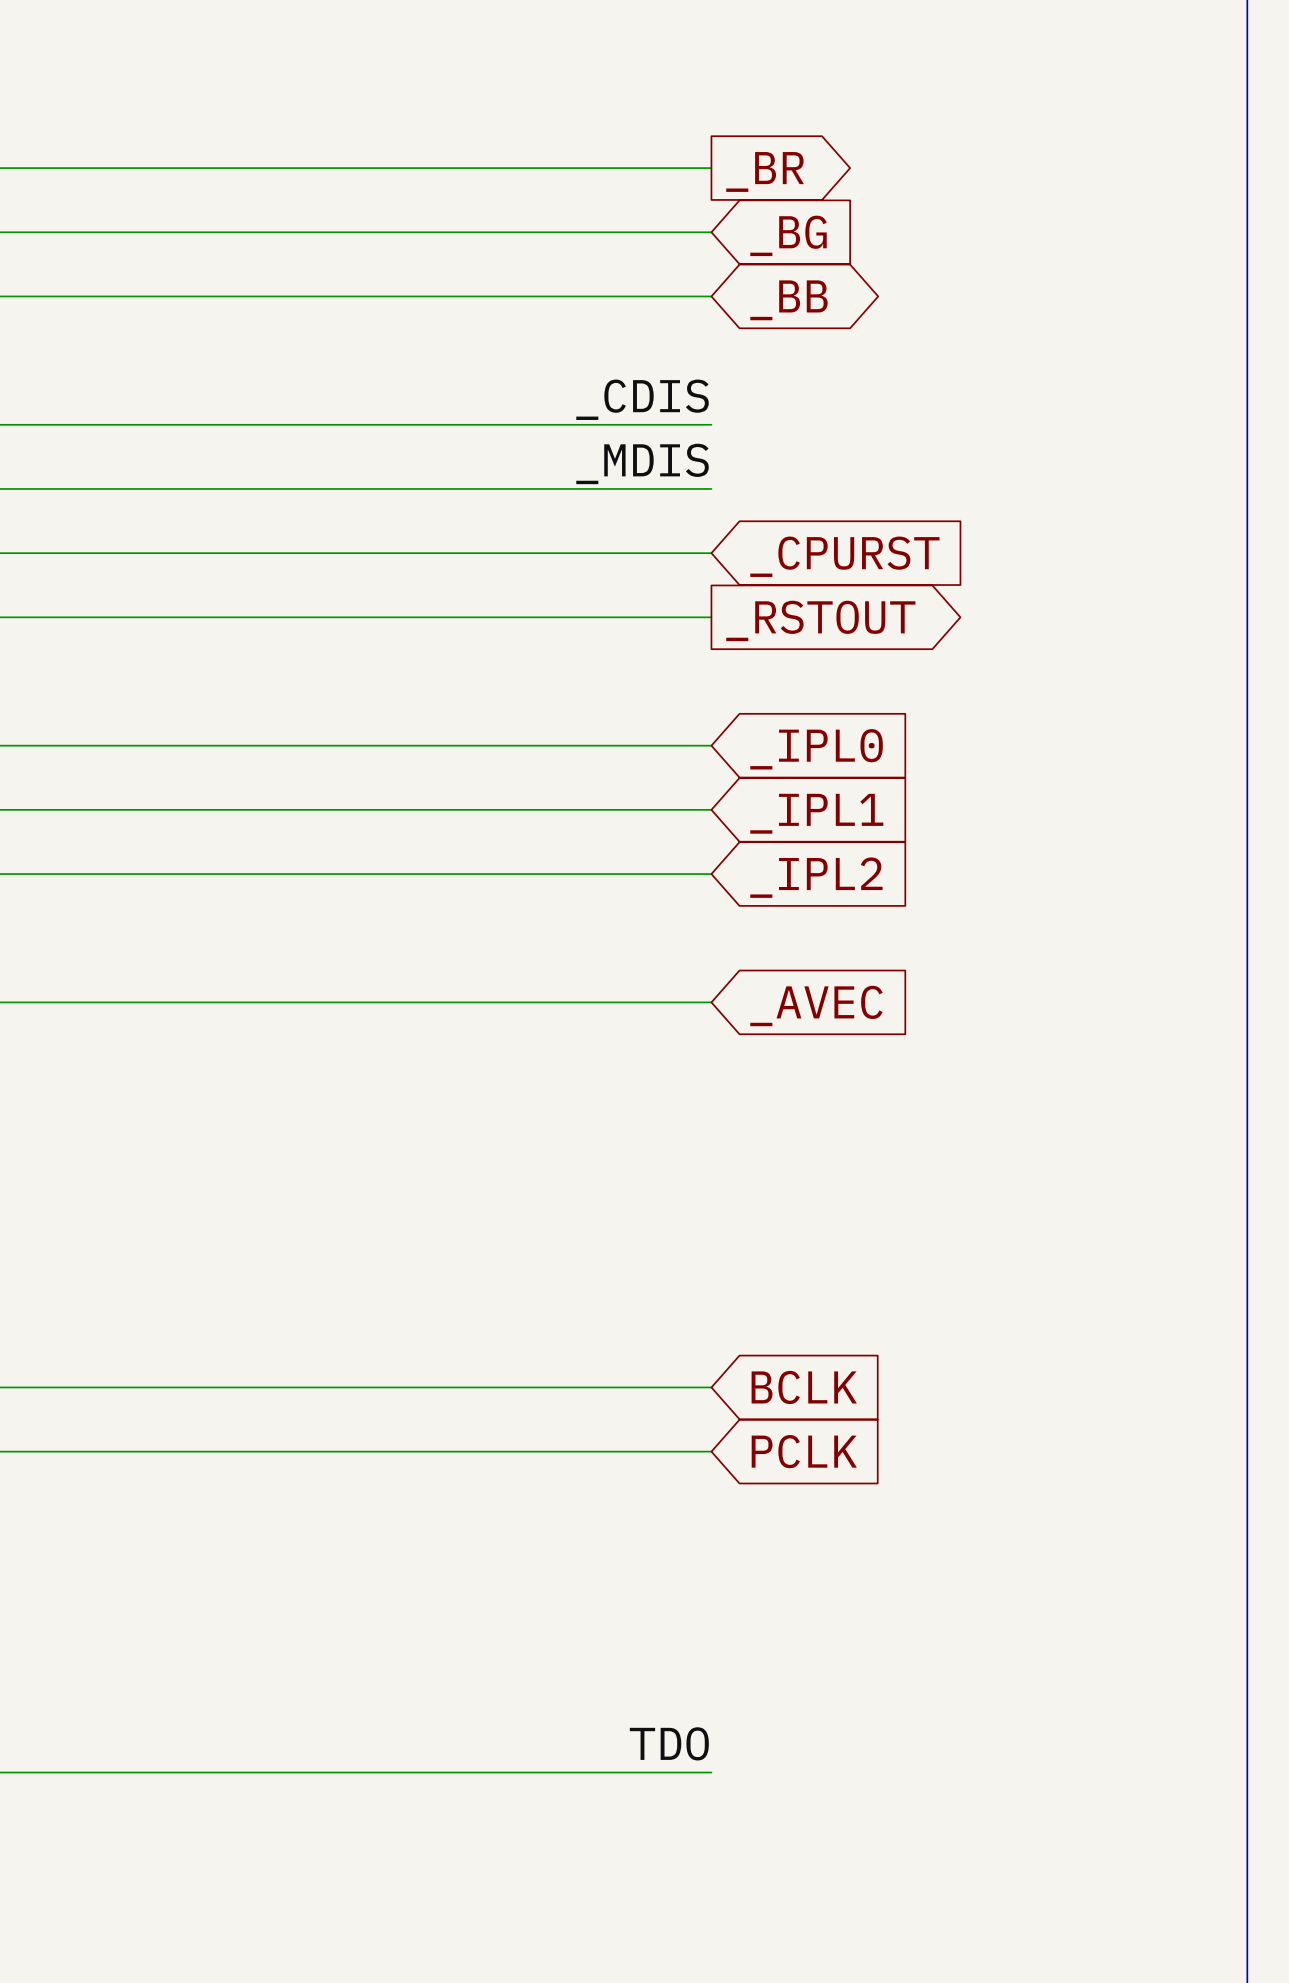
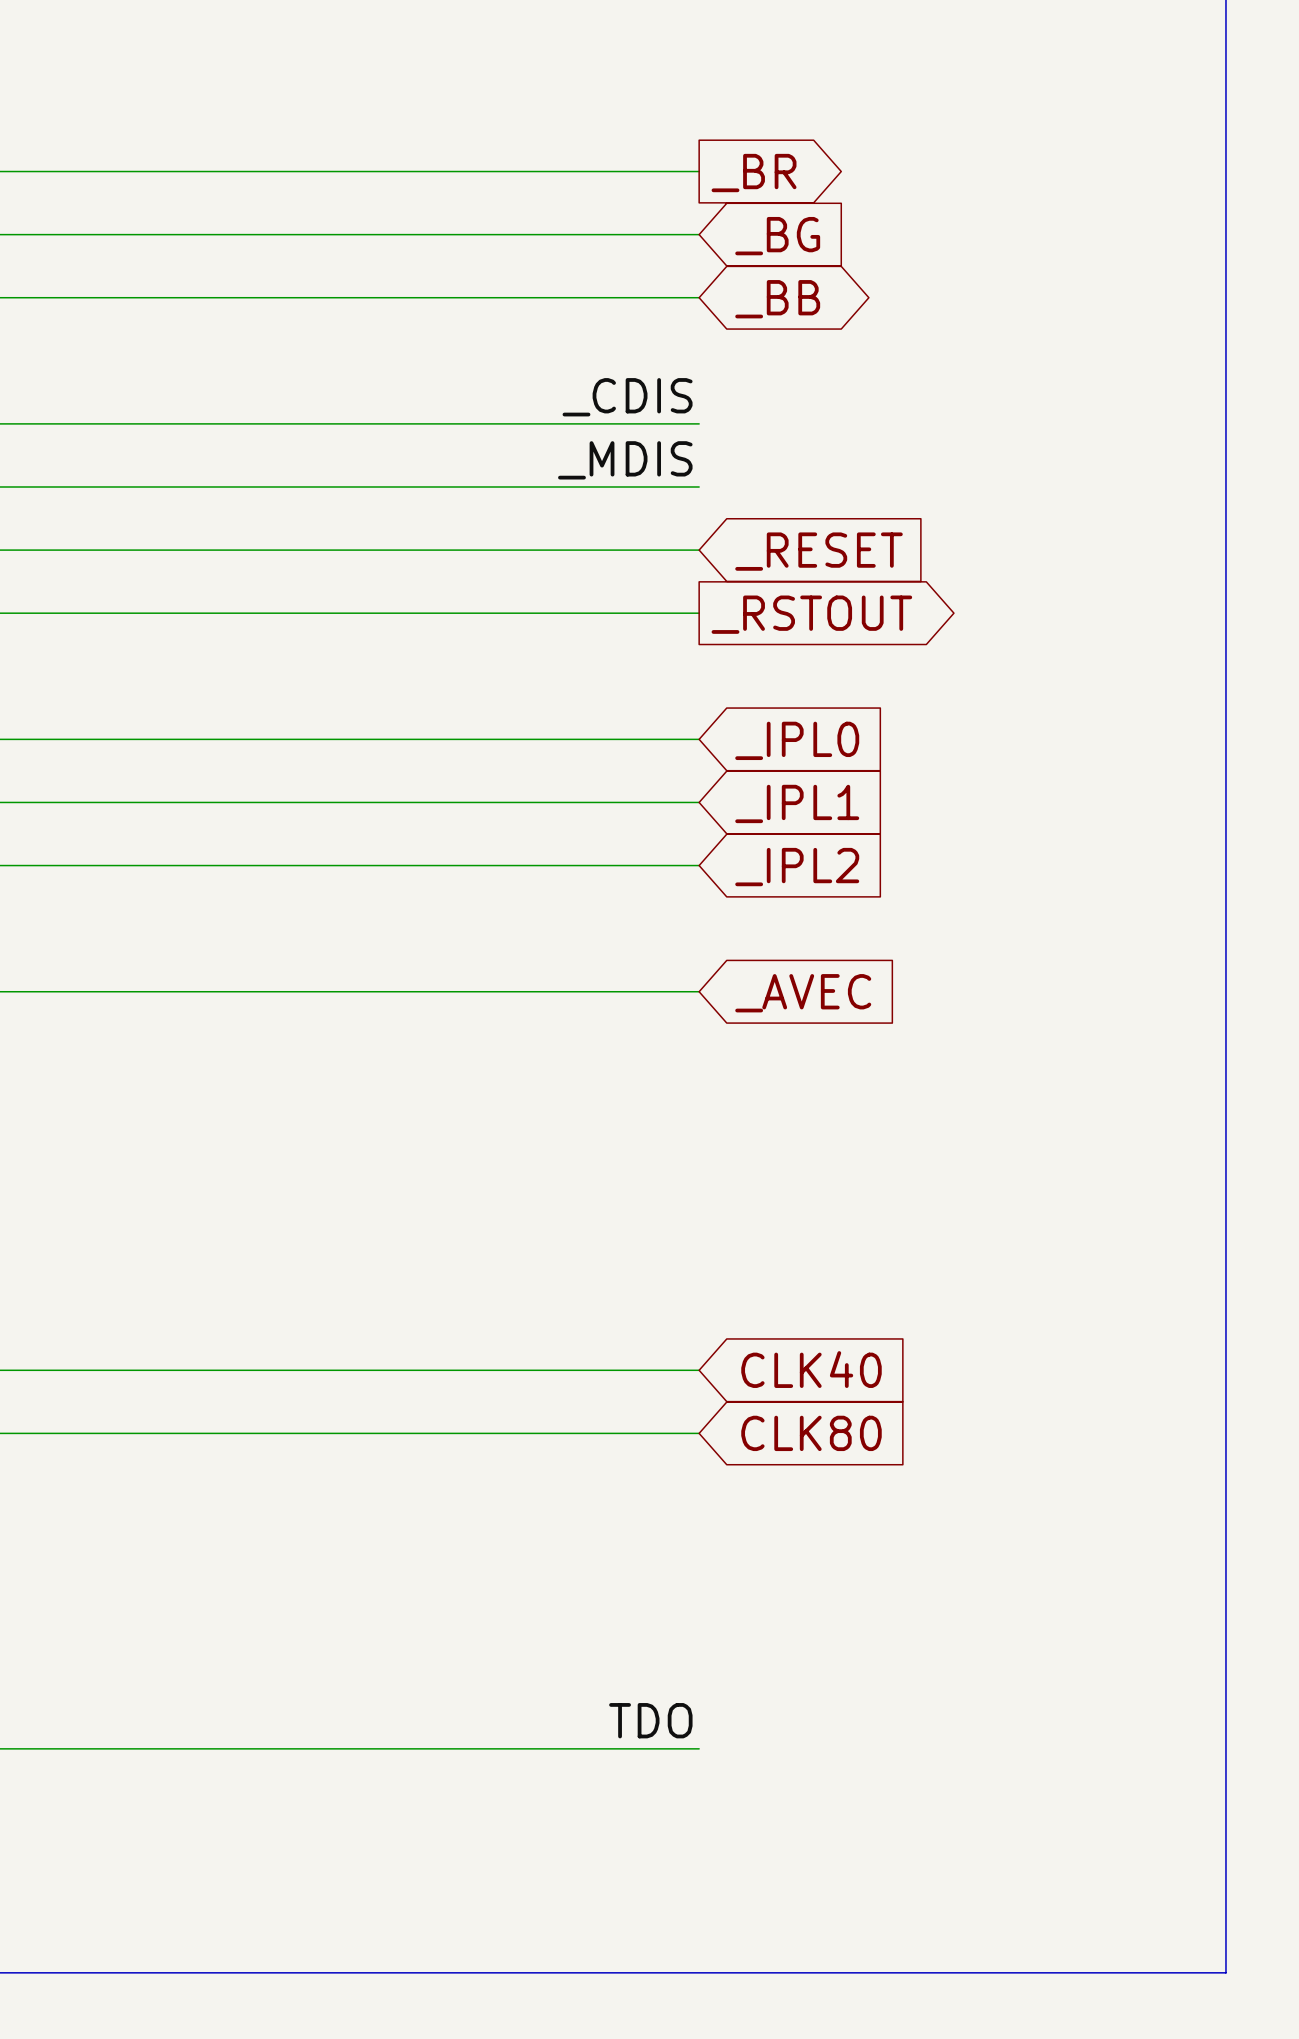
global label: _CPURST (844, 556) -> _RESET (819, 551)
global label: BCLK (804, 1387) -> CLK40 (811, 1369)
global label: PCLK (804, 1451) -> CLK80 (811, 1433)

